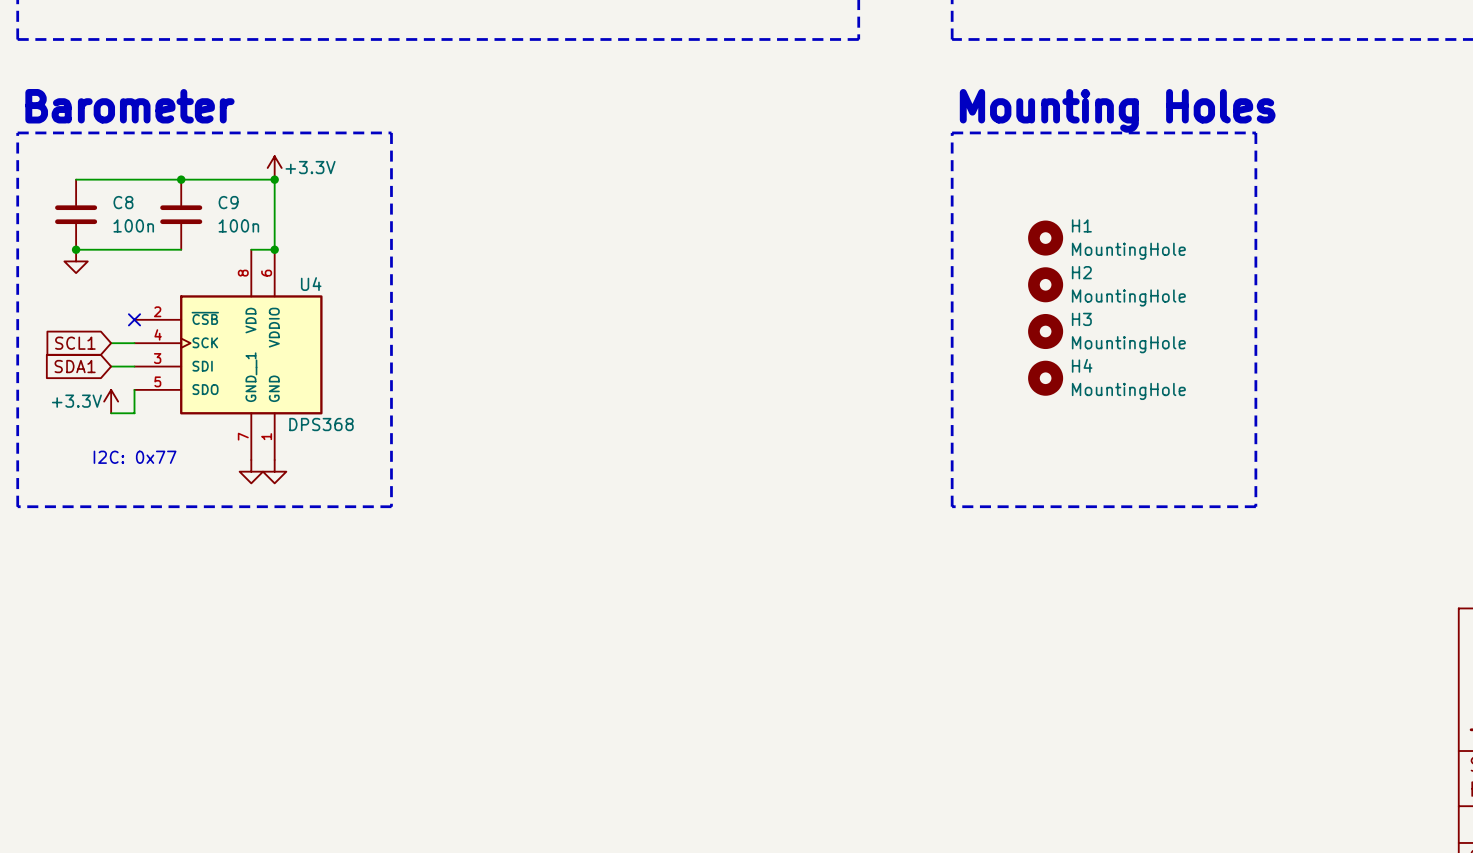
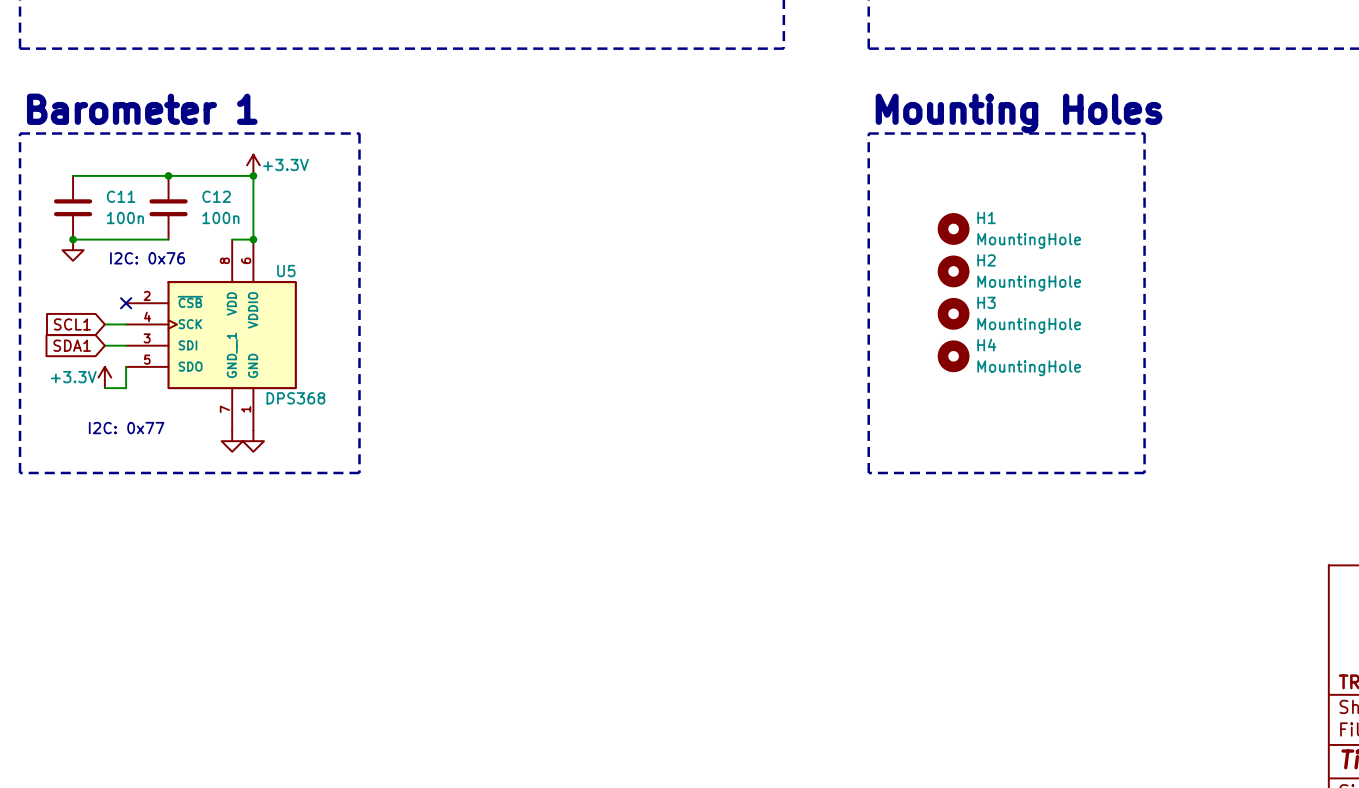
text: Barometer (129, 106) -> Barometer 1 (142, 109)
C8 name: C8 (123, 202) -> C11 (121, 196)
C9 name: C9 (228, 202) -> C12 (216, 196)
text: none -> I2C: 0x76 (147, 258)
U4 name: U4 (311, 284) -> U5 (286, 271)

